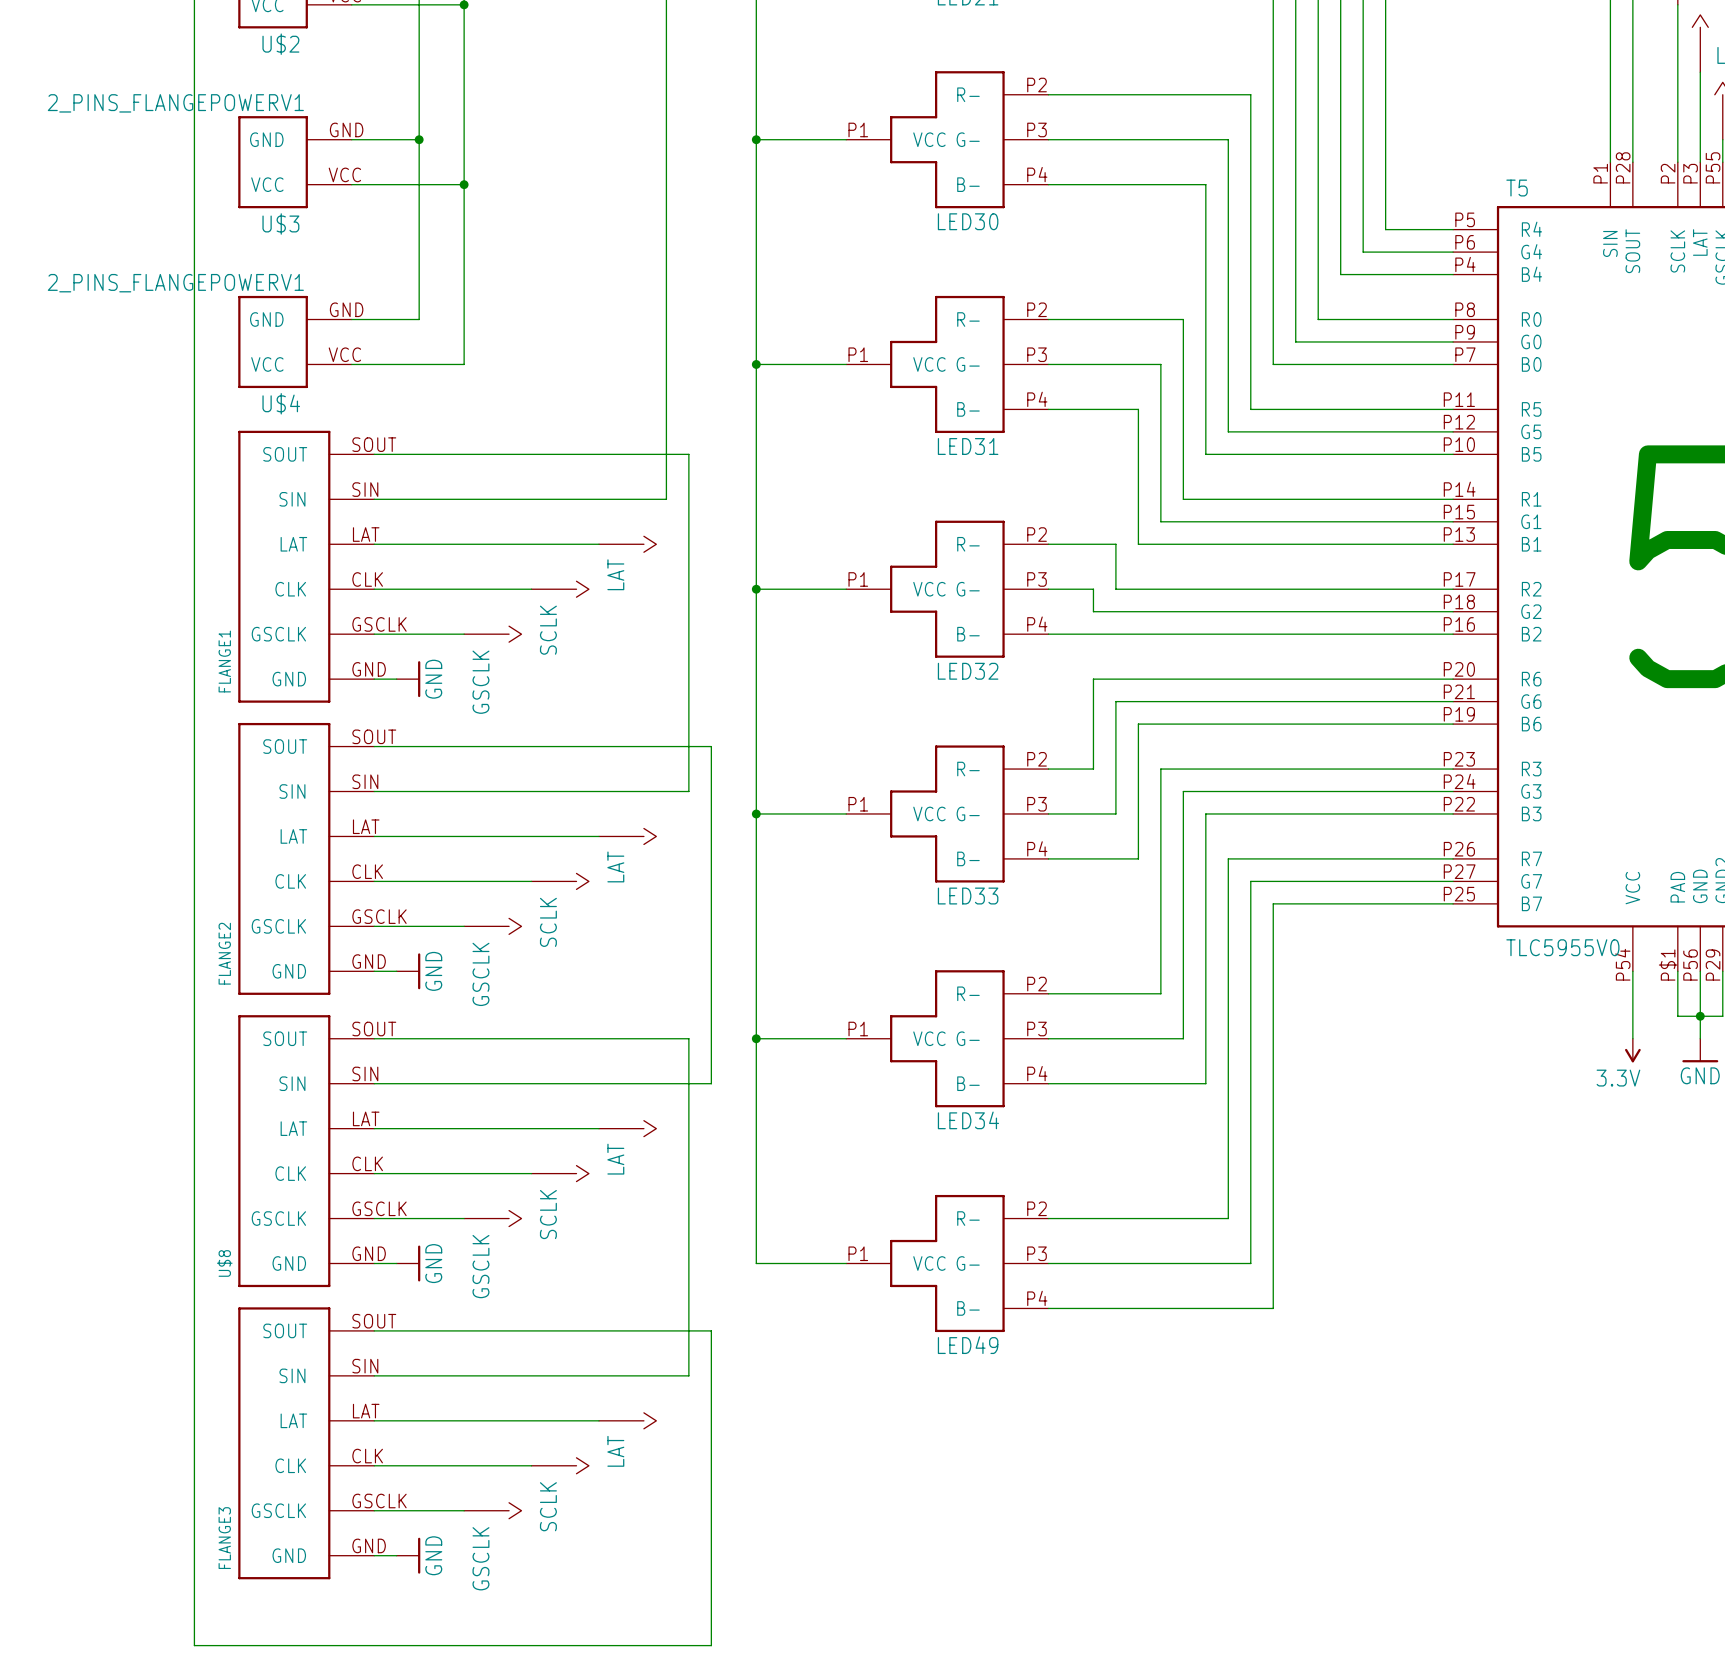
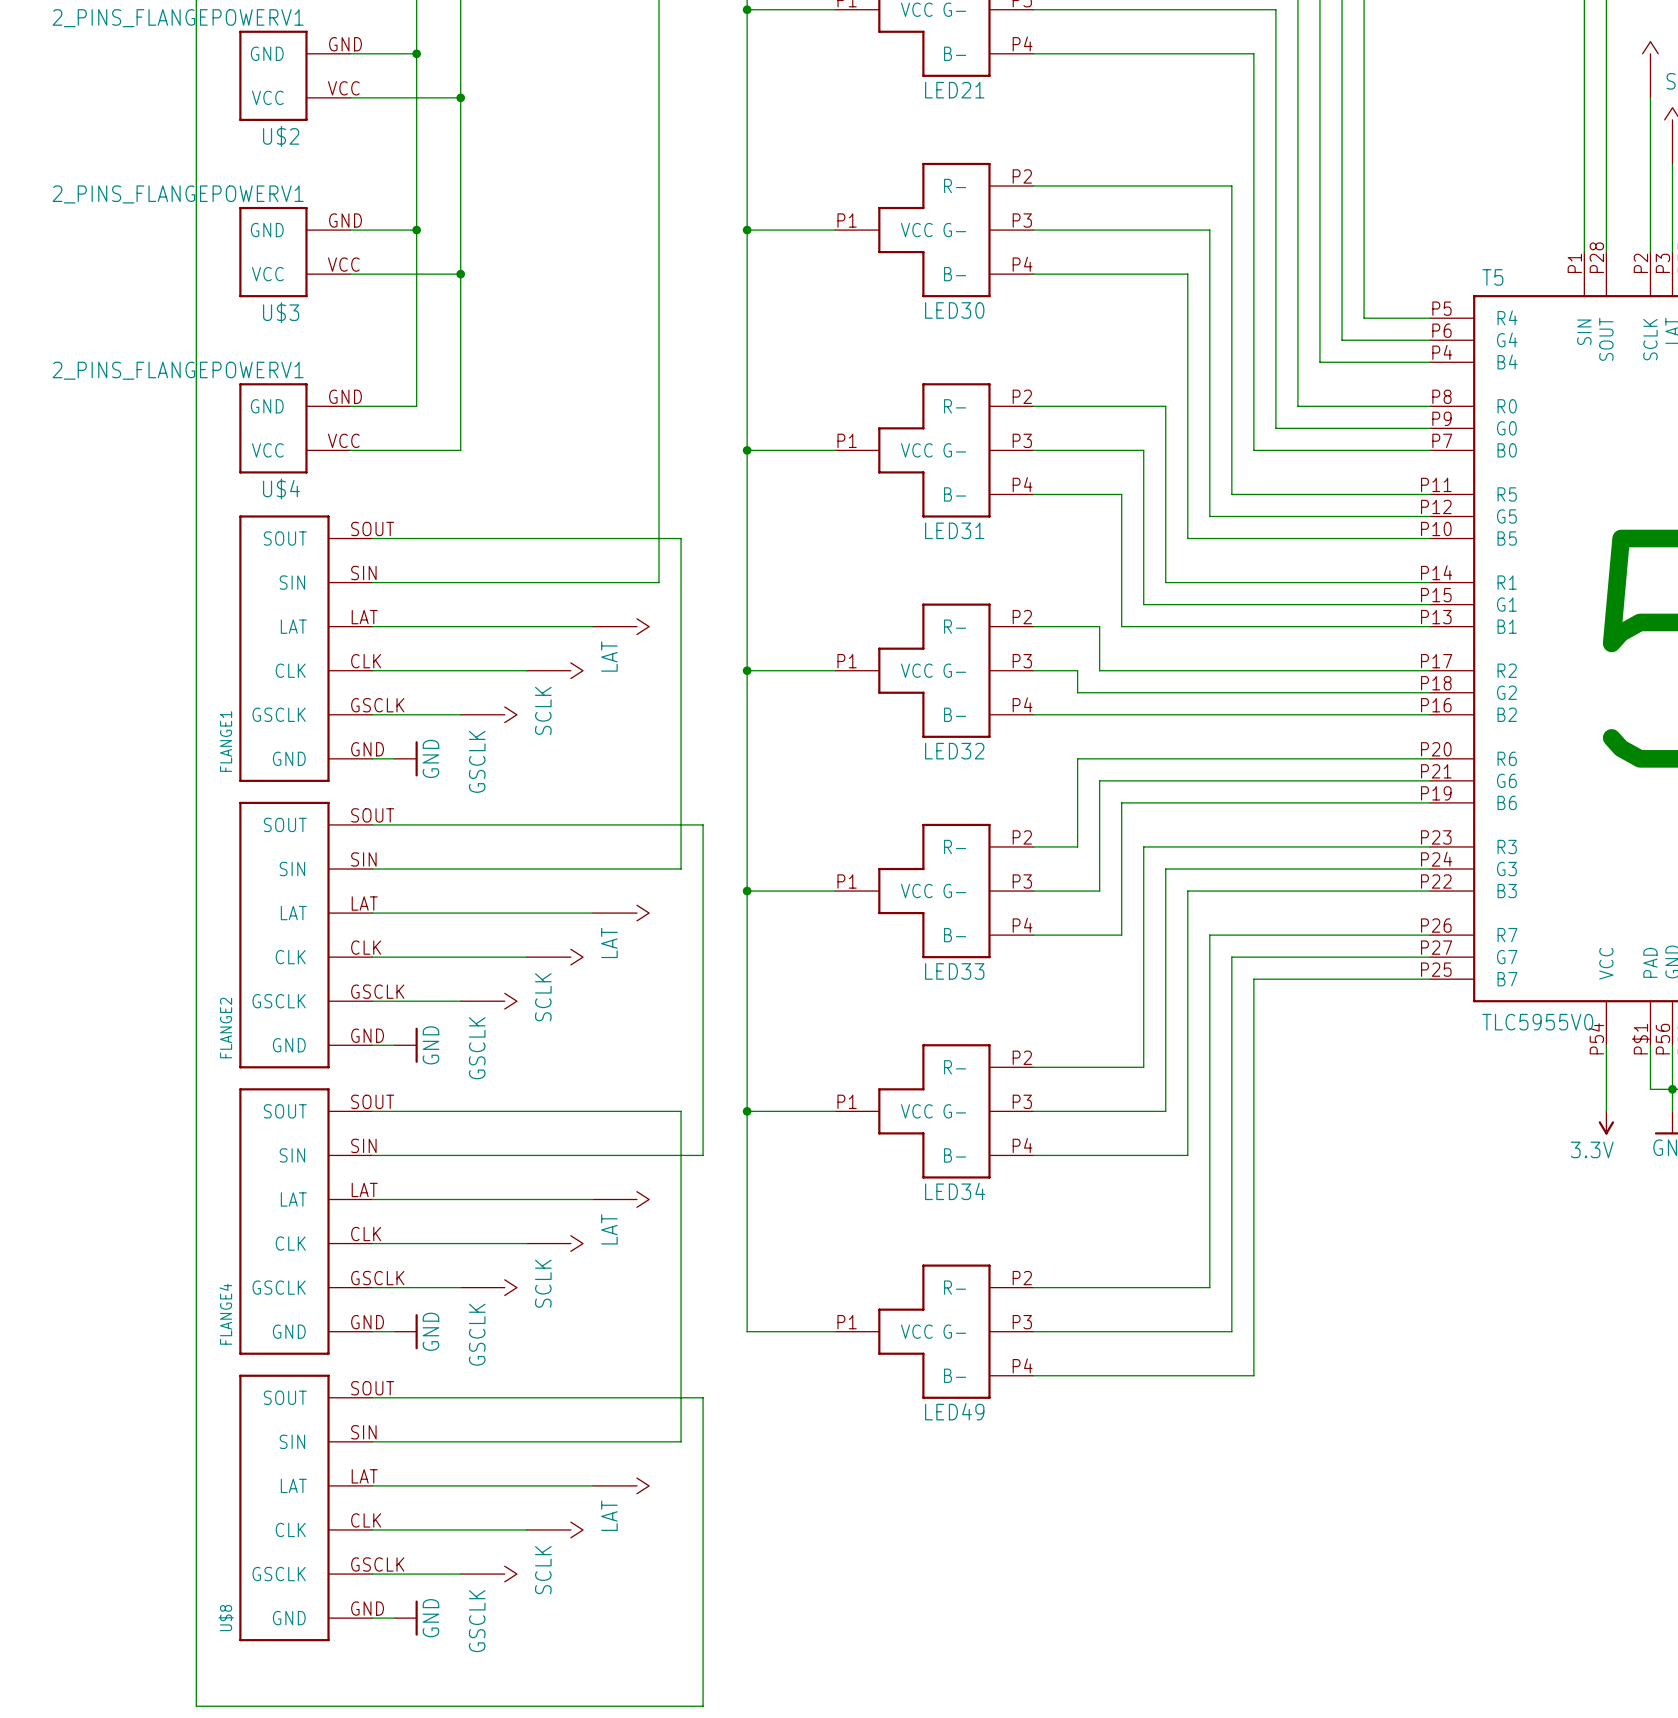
U$8 name: U$8 (224, 1263) -> FLANGE4 (225, 1314)
FLANGE3 name: FLANGE3 (224, 1538) -> U$8 (226, 1618)

